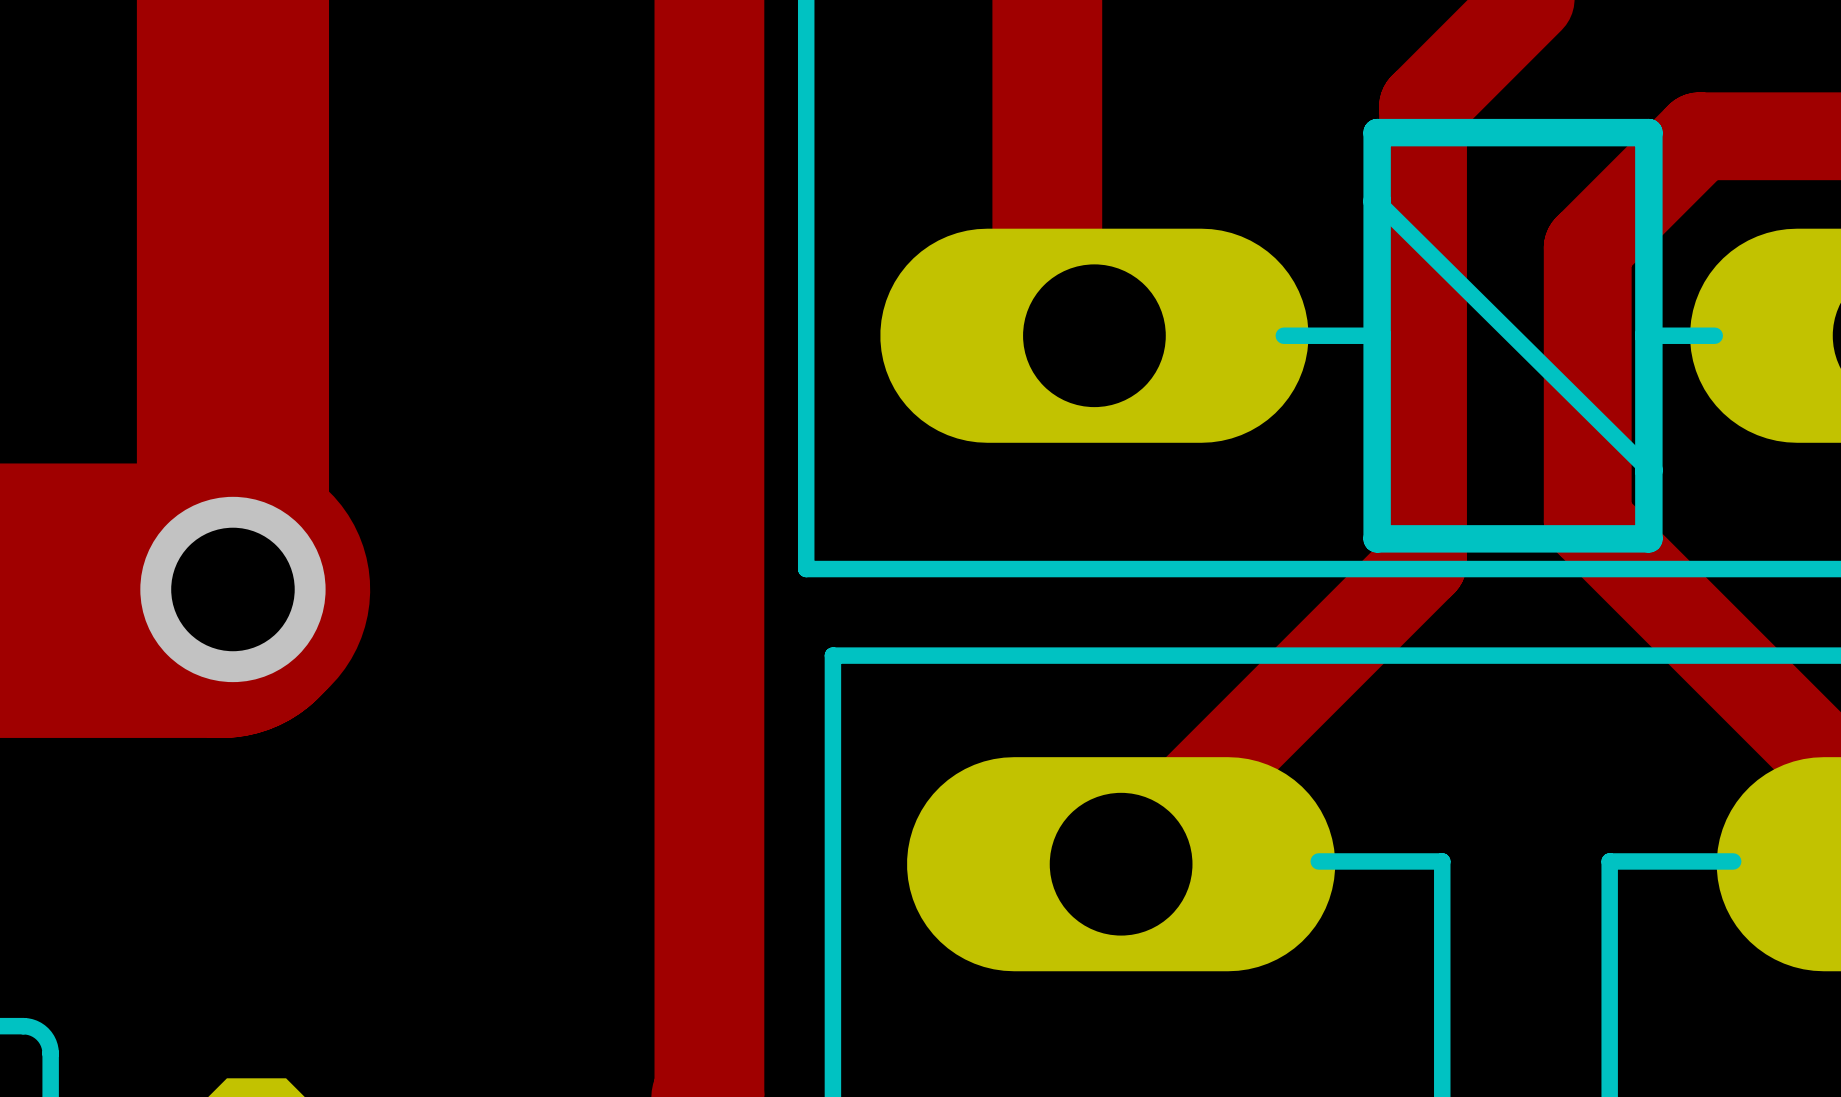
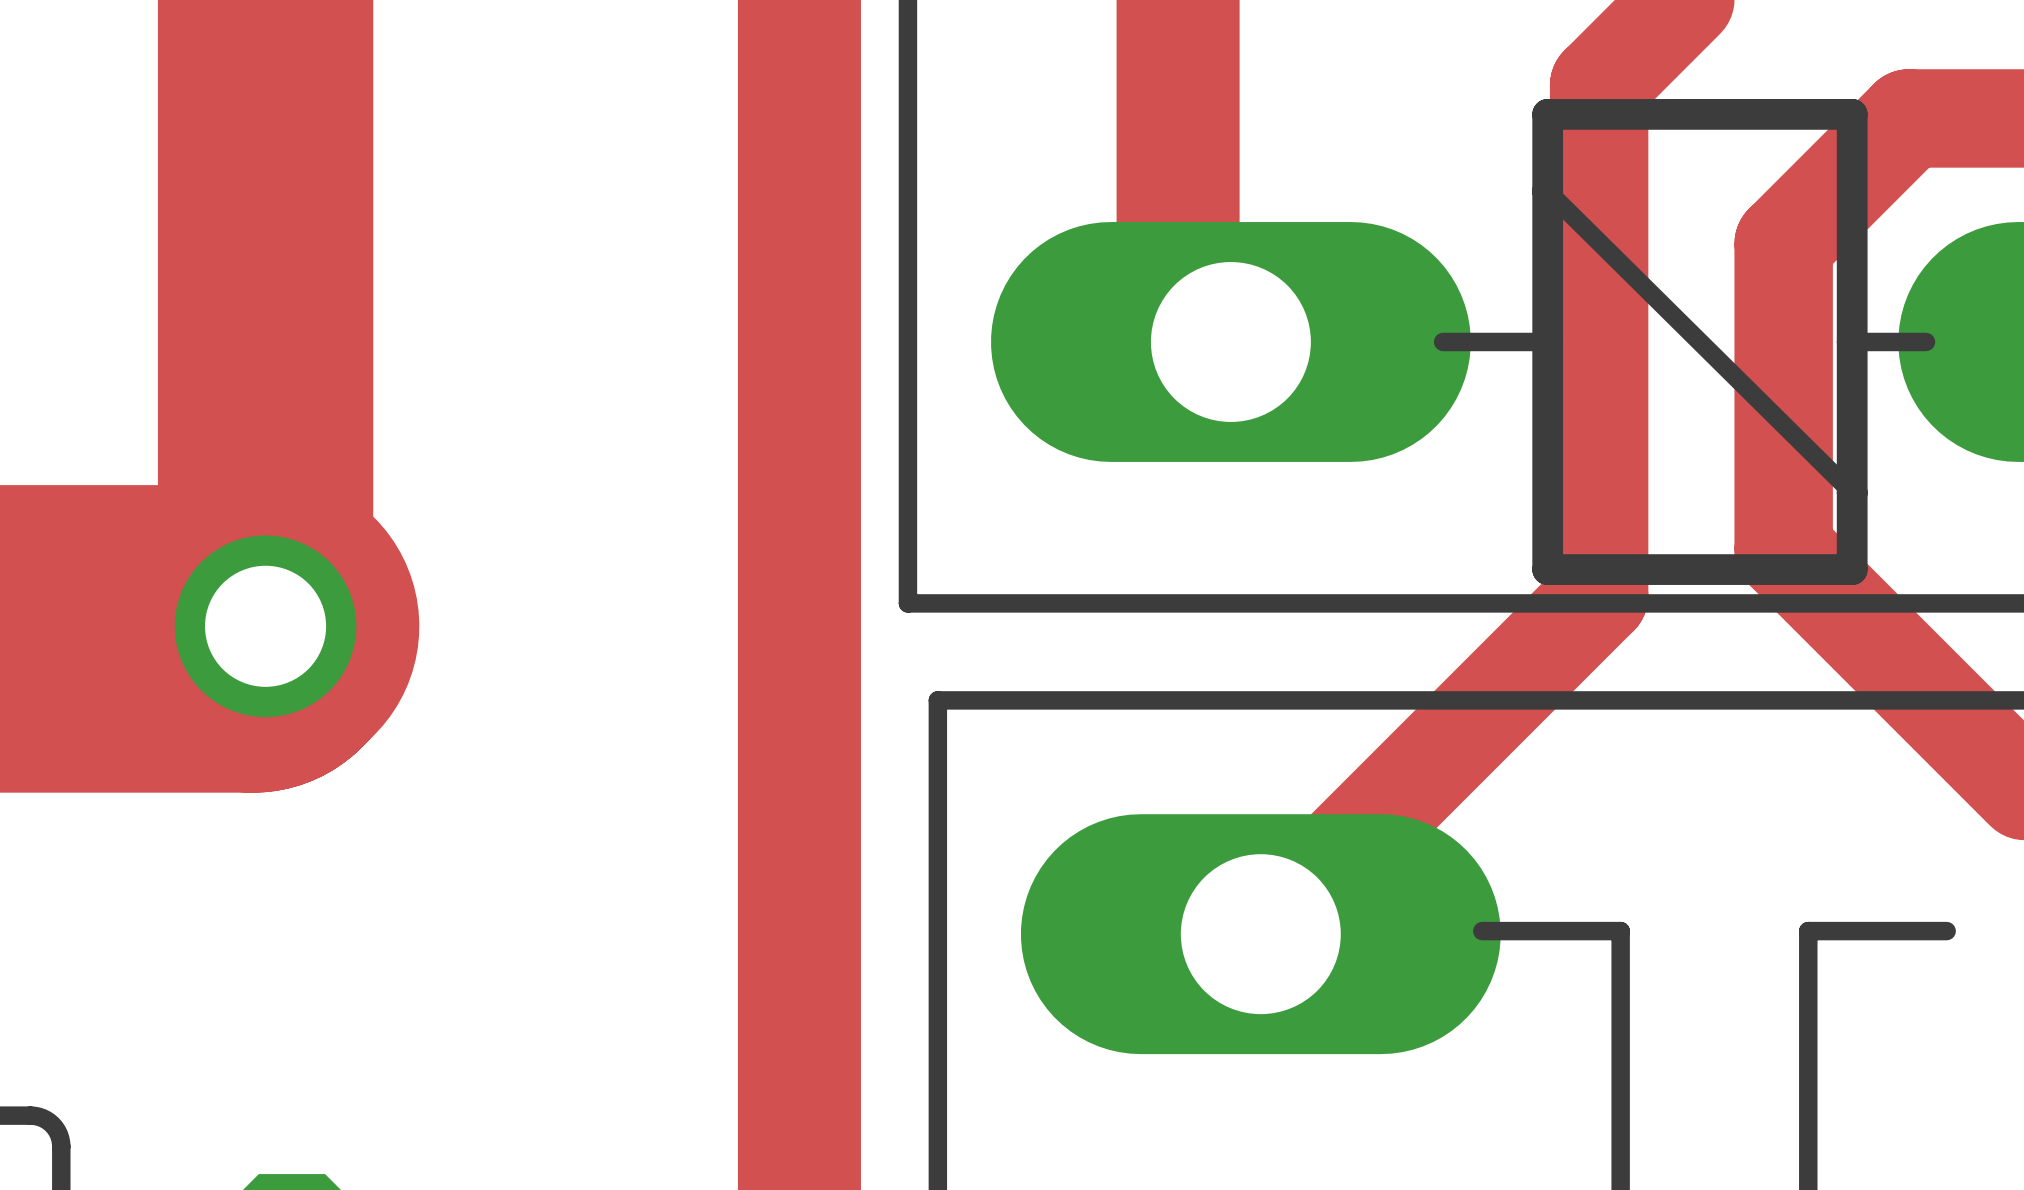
via size: [140, 496, 326, 683] -> [174, 535, 357, 718]

